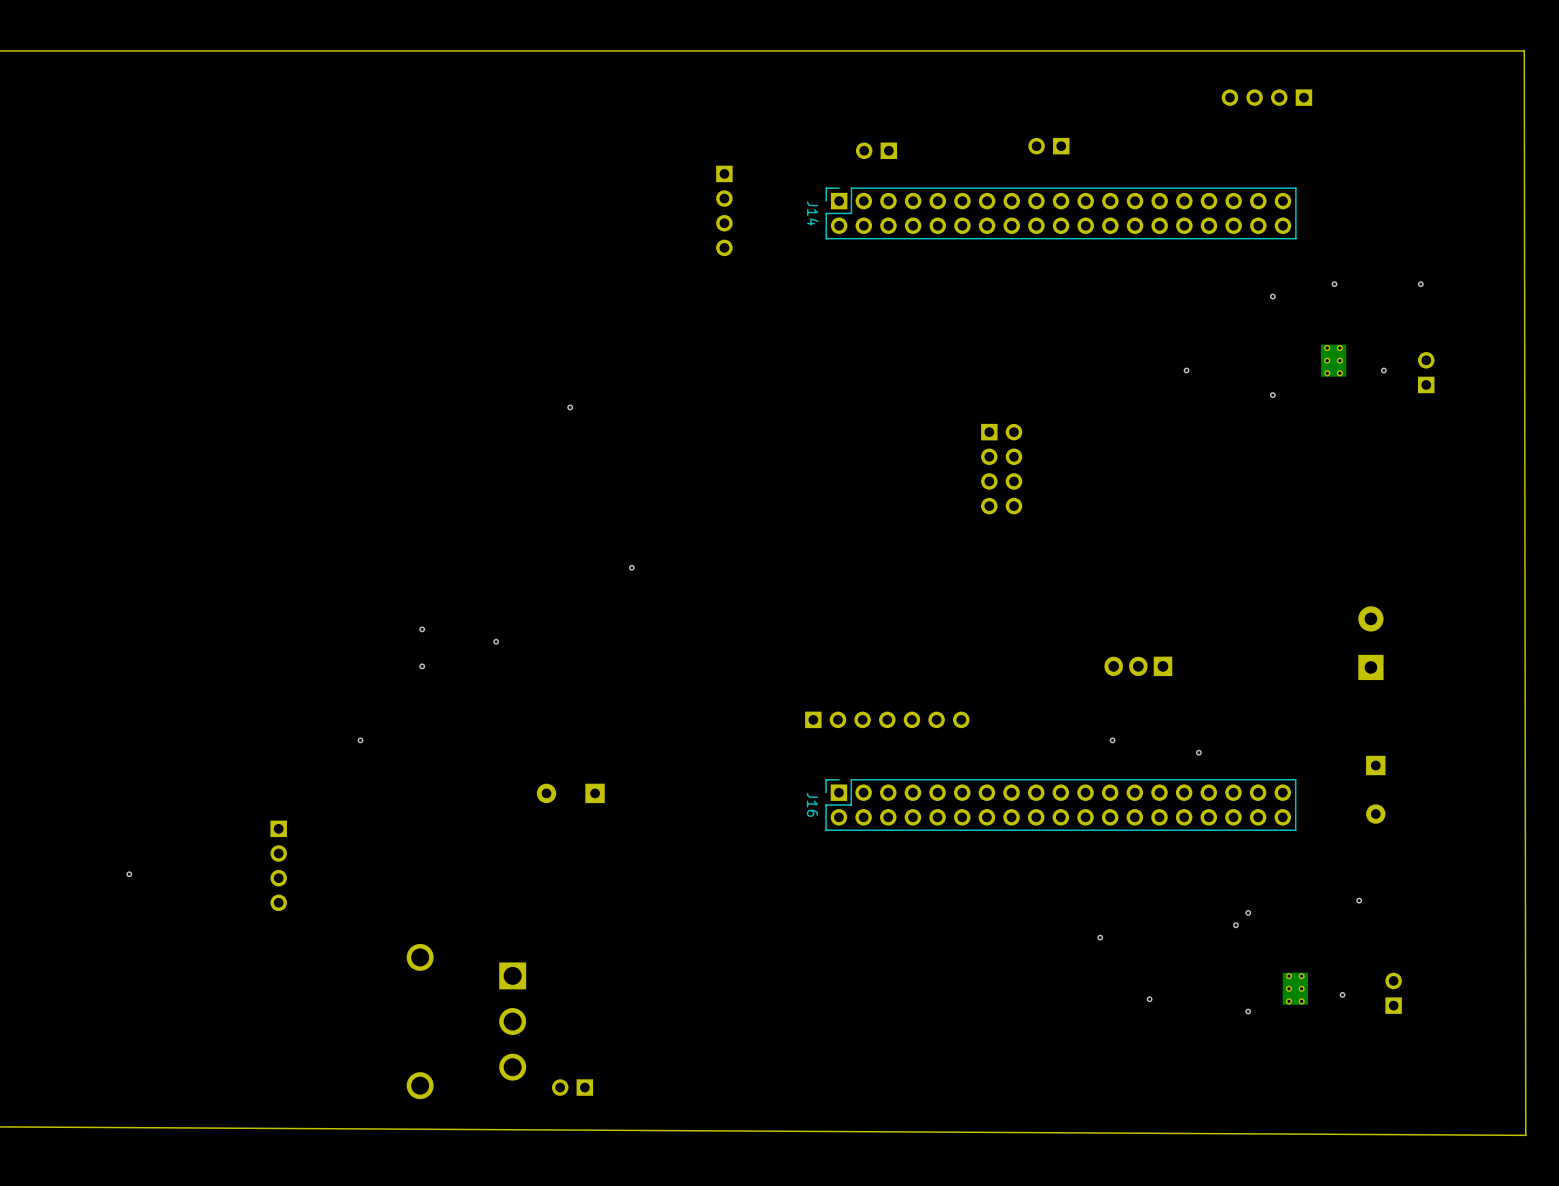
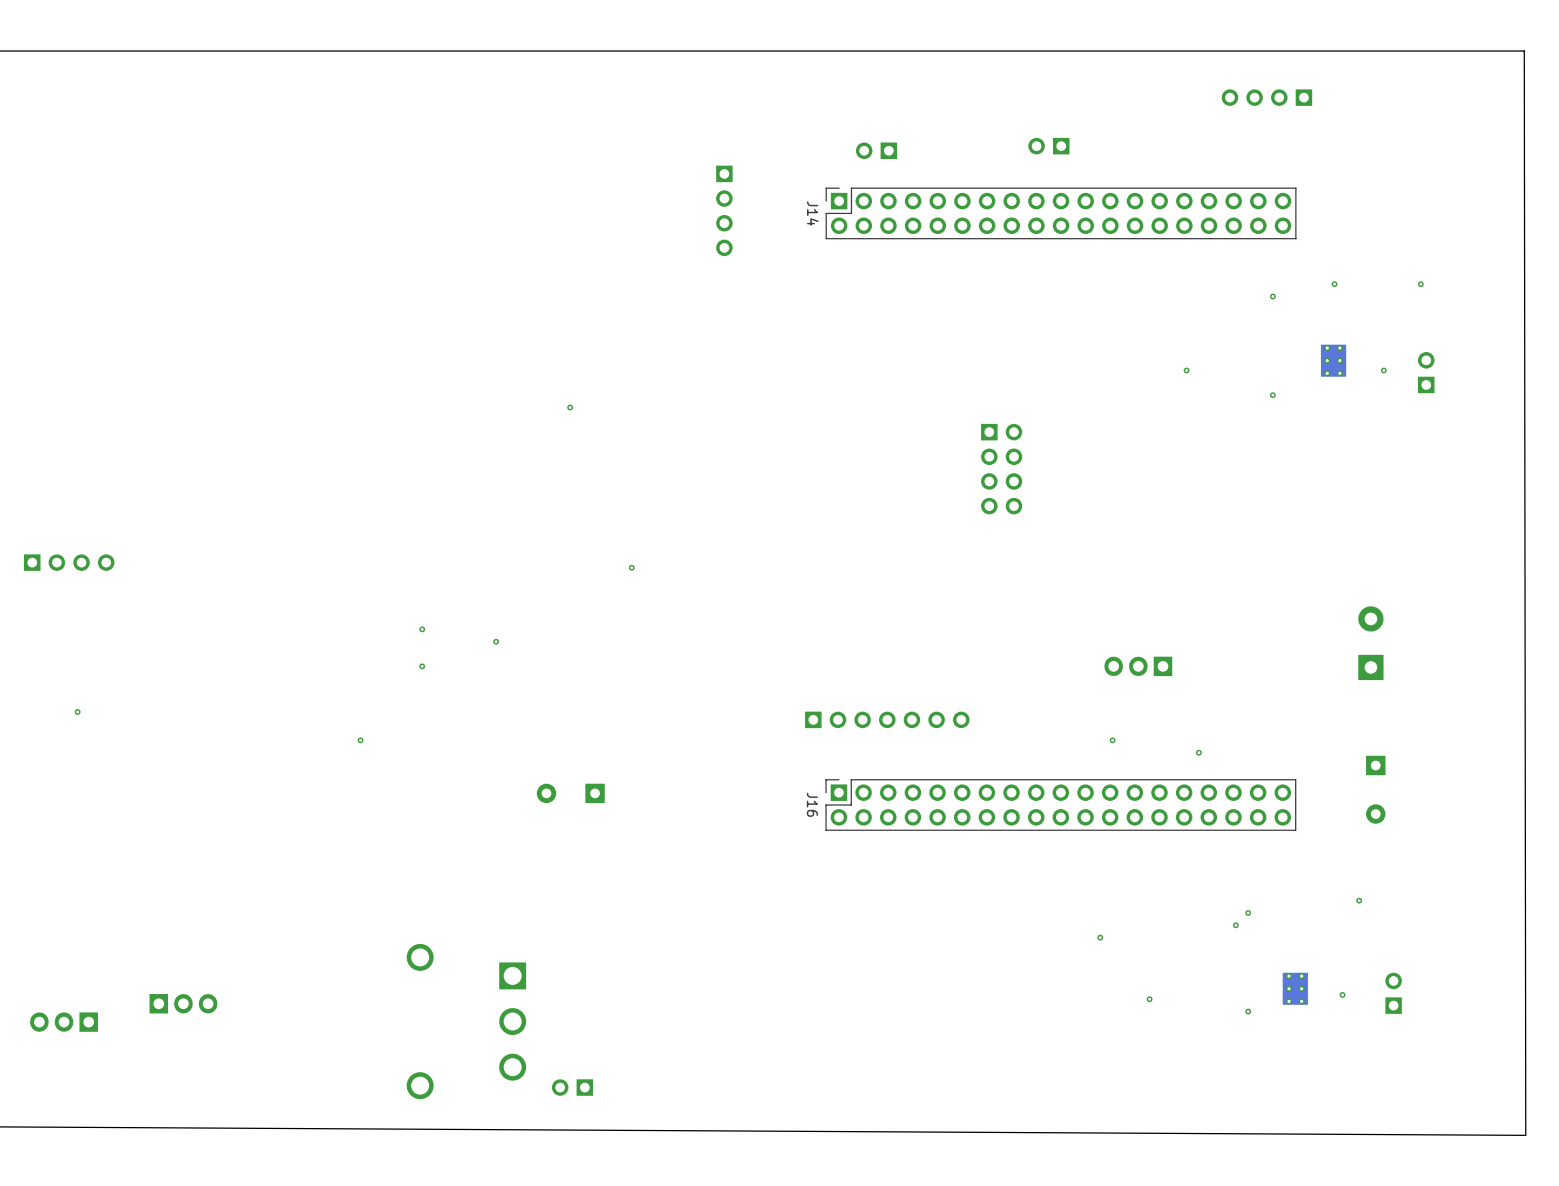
part: none -> (69, 562)
via: none -> (77, 711)
part: (278, 865) -> none
via: (129, 874) -> none
part: none -> (183, 1003)
part: none -> (64, 1022)

